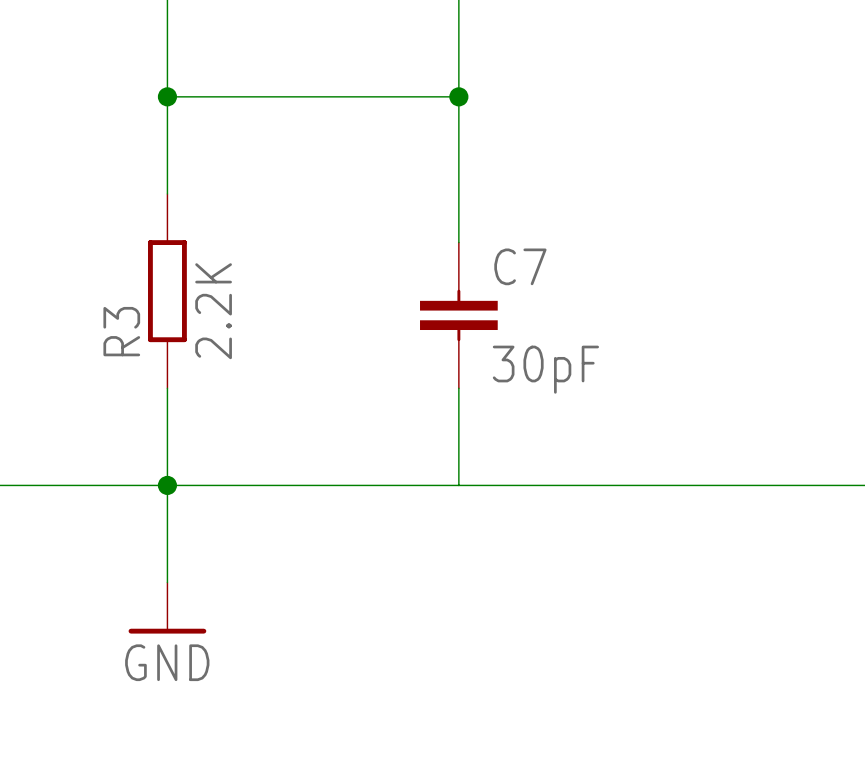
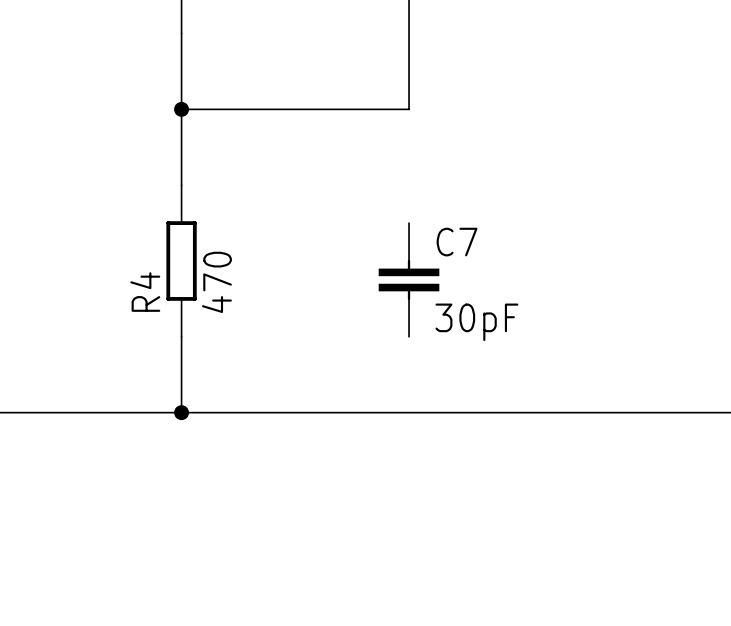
wire: (458, 96) (458, 242) -> none
junction: (458, 96) -> none
R3 value: 2.2K (213, 311) -> 470 (216, 282)
R3 name: R3 (121, 331) -> R4 (145, 292)
wire: (458, 388) (458, 485) -> none
wire: (167, 485) (167, 582) -> none
power symbol: GND (167, 608) -> none

